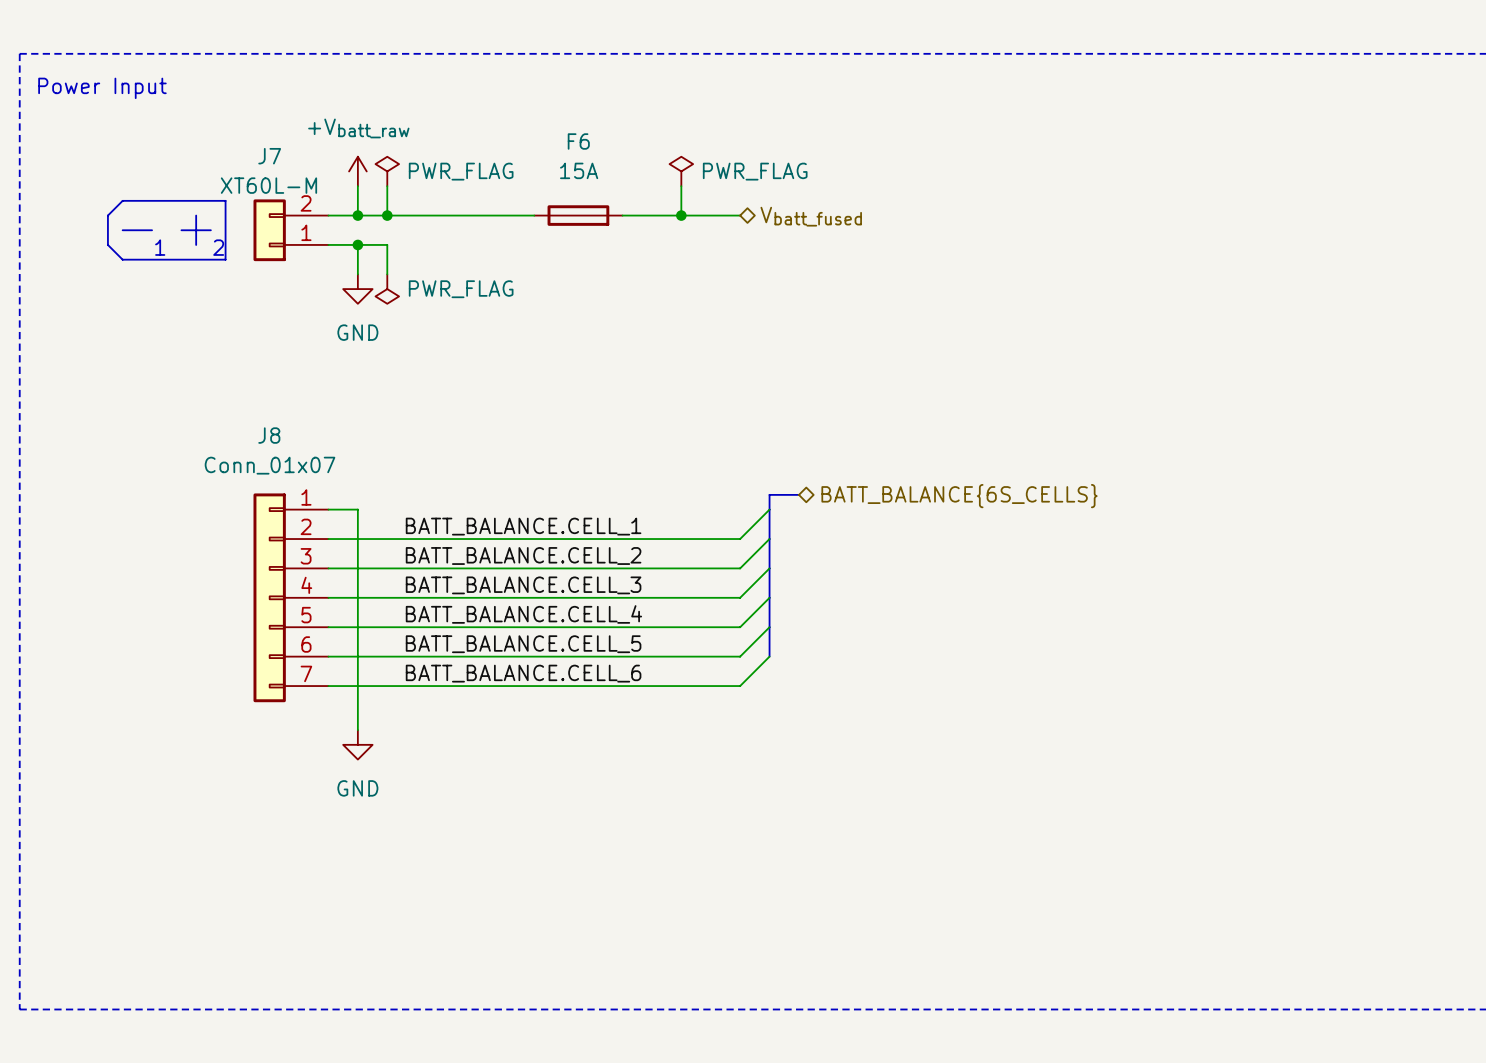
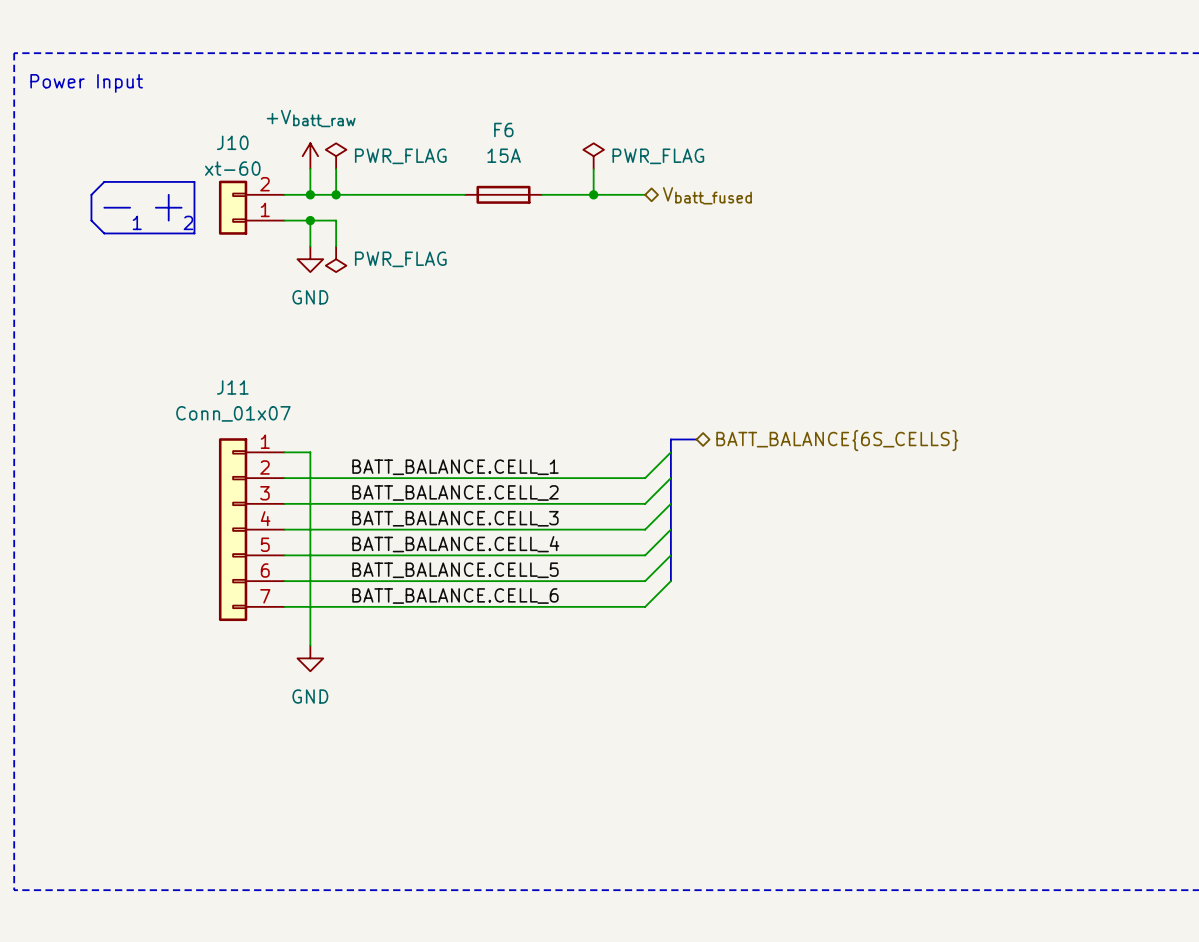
J7 name: J7 (269, 156) -> J10 (232, 142)
J7 value: XT60L-M (268, 185) -> xt-60 (232, 168)
J8 name: J8 (269, 435) -> J11 (232, 387)

